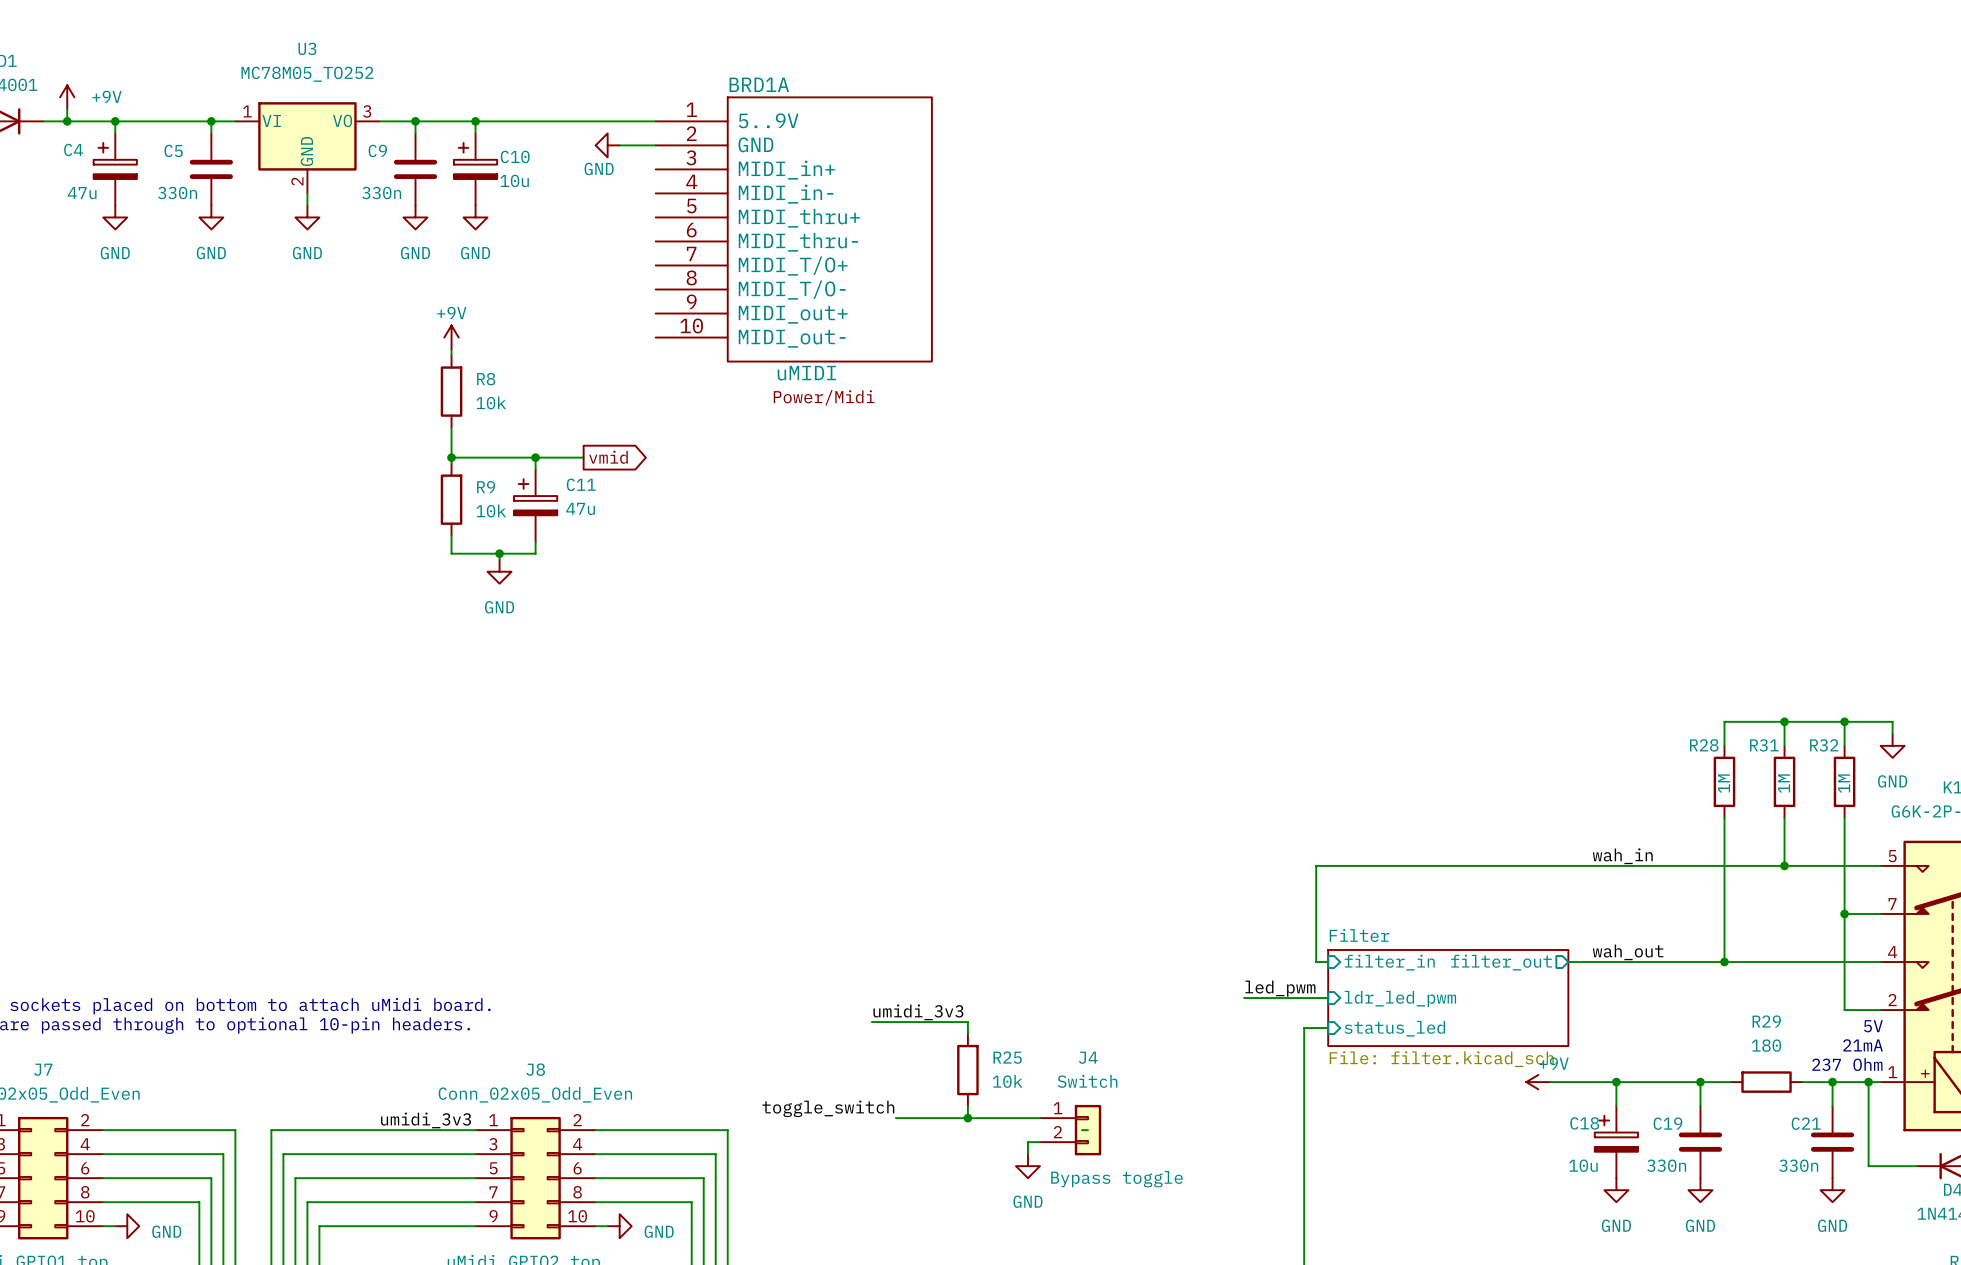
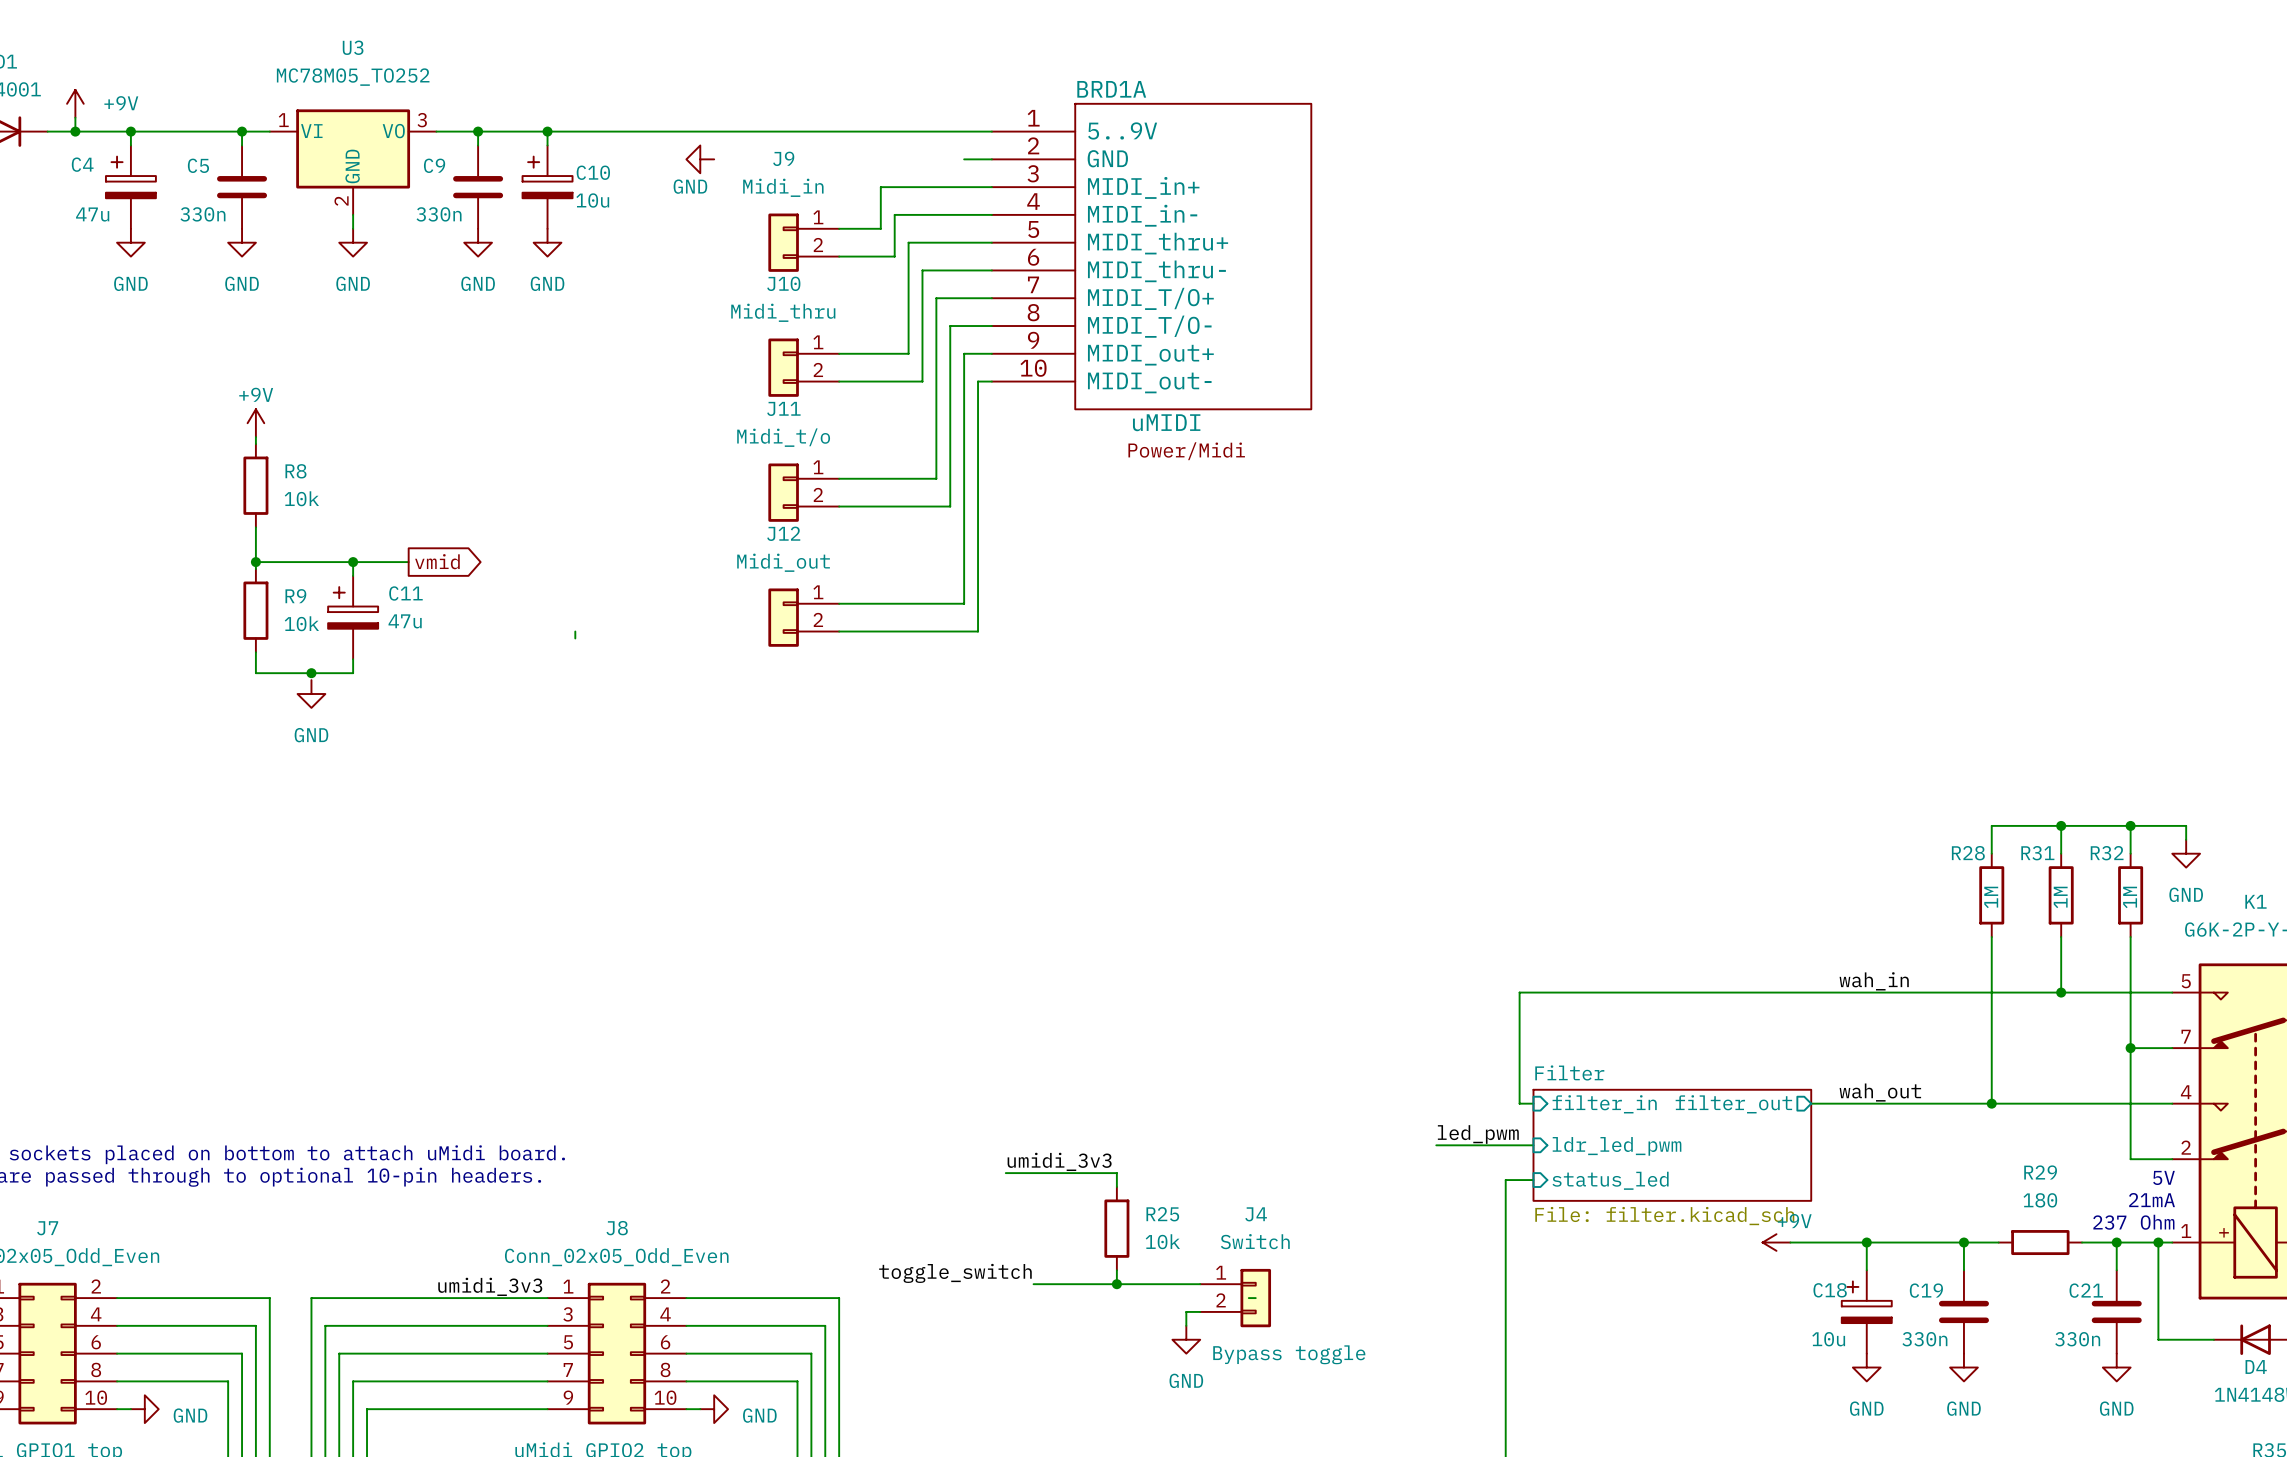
wire: none -> (755, 131) (991, 131)
wire: (619, 145) (655, 145) -> none
wire: none -> (964, 159) (991, 159)
wire: none -> (991, 187) (880, 187) (880, 228) (839, 228)
wire: none -> (991, 214) (894, 214) (894, 256) (839, 256)
J9: none -> Midi_in (803, 242)
wire: none -> (991, 242) (908, 242) (908, 353) (839, 353)
BRD1A position: (793, 229) -> (1151, 256)
wire: none -> (991, 270) (922, 270) (922, 381) (839, 381)
wire: none -> (991, 298) (936, 298) (936, 478) (839, 478)
wire: none -> (991, 326) (950, 326) (950, 506) (839, 506)
wire: none -> (991, 353) (964, 353) (964, 603) (839, 603)
J10: none -> Midi_thru (803, 367)
power symbol position: +9V (451, 337) -> +9V (255, 423)
wire: none -> (991, 381) (978, 381) (978, 631) (839, 631)
wire: (451, 349) (451, 355) -> (255, 437) (255, 444)
R8 position: (451, 391) -> (255, 485)
wire: (451, 427) (451, 463) -> (255, 527) (255, 569)
J11: none -> Midi_t/o (803, 492)
wire: (451, 457) (583, 457) -> (255, 562) (408, 562)
junction: (451, 457) -> none
wire: (535, 457) (535, 469) -> (353, 562) (353, 575)
junction: (535, 457) -> none
global label position: vmid (608, 457) -> vmid (437, 561)
junction: none -> (255, 562)
junction: none -> (353, 562)
R9 position: (451, 499) -> (255, 610)
C11 position: (535, 505) -> (353, 617)
wire: (451, 535) (451, 553) (535, 553) (535, 541) -> (255, 652) (255, 673) (353, 673) (353, 659)
J12: none -> Midi_out (803, 617)
junction: (499, 553) -> none
power symbol position: GND (499, 571) -> GND (311, 694)
junction: none -> (311, 673)

